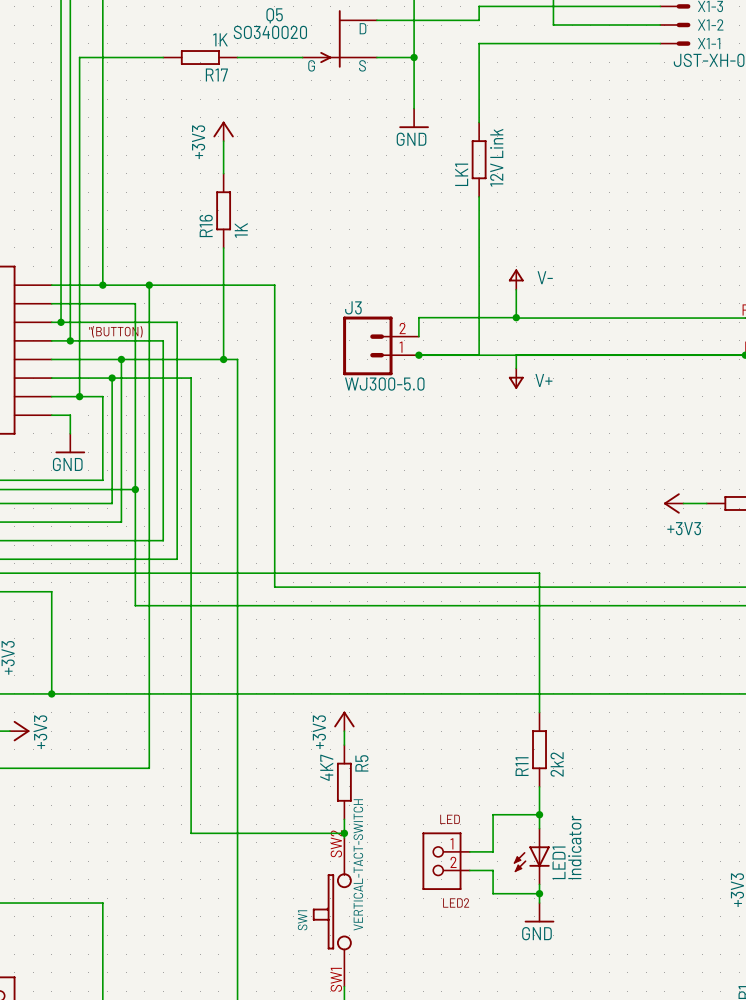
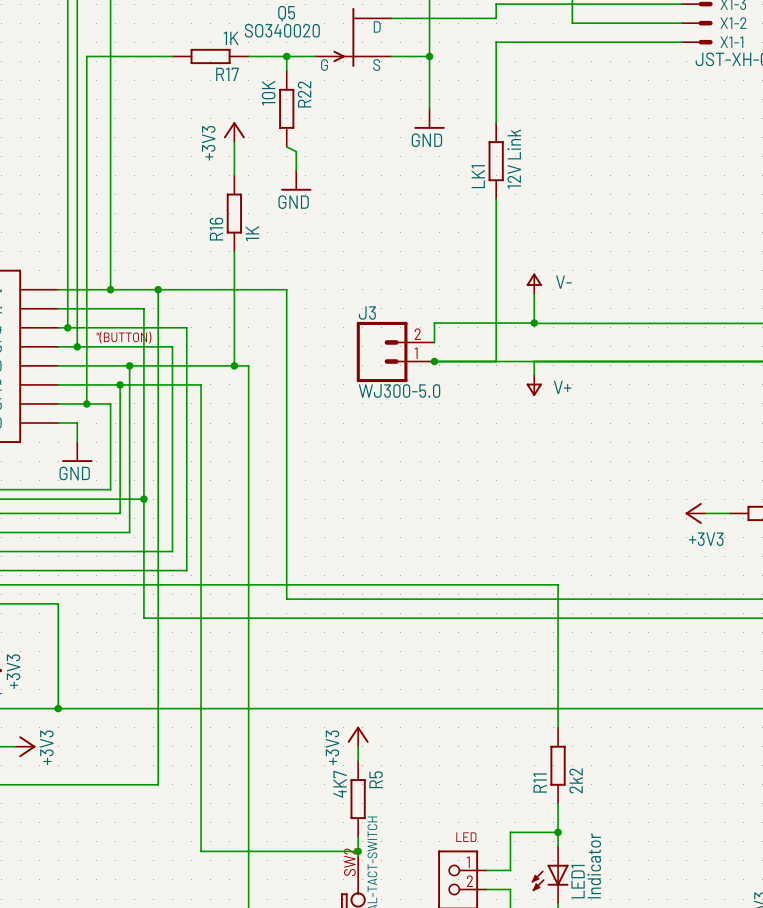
wire: none -> (286, 56) (286, 70)
junction: none -> (286, 56)
R22: none -> 10K (286, 108)
wire: none -> (286, 146) (296, 151) (296, 170)
power symbol: none -> GND (296, 180)

